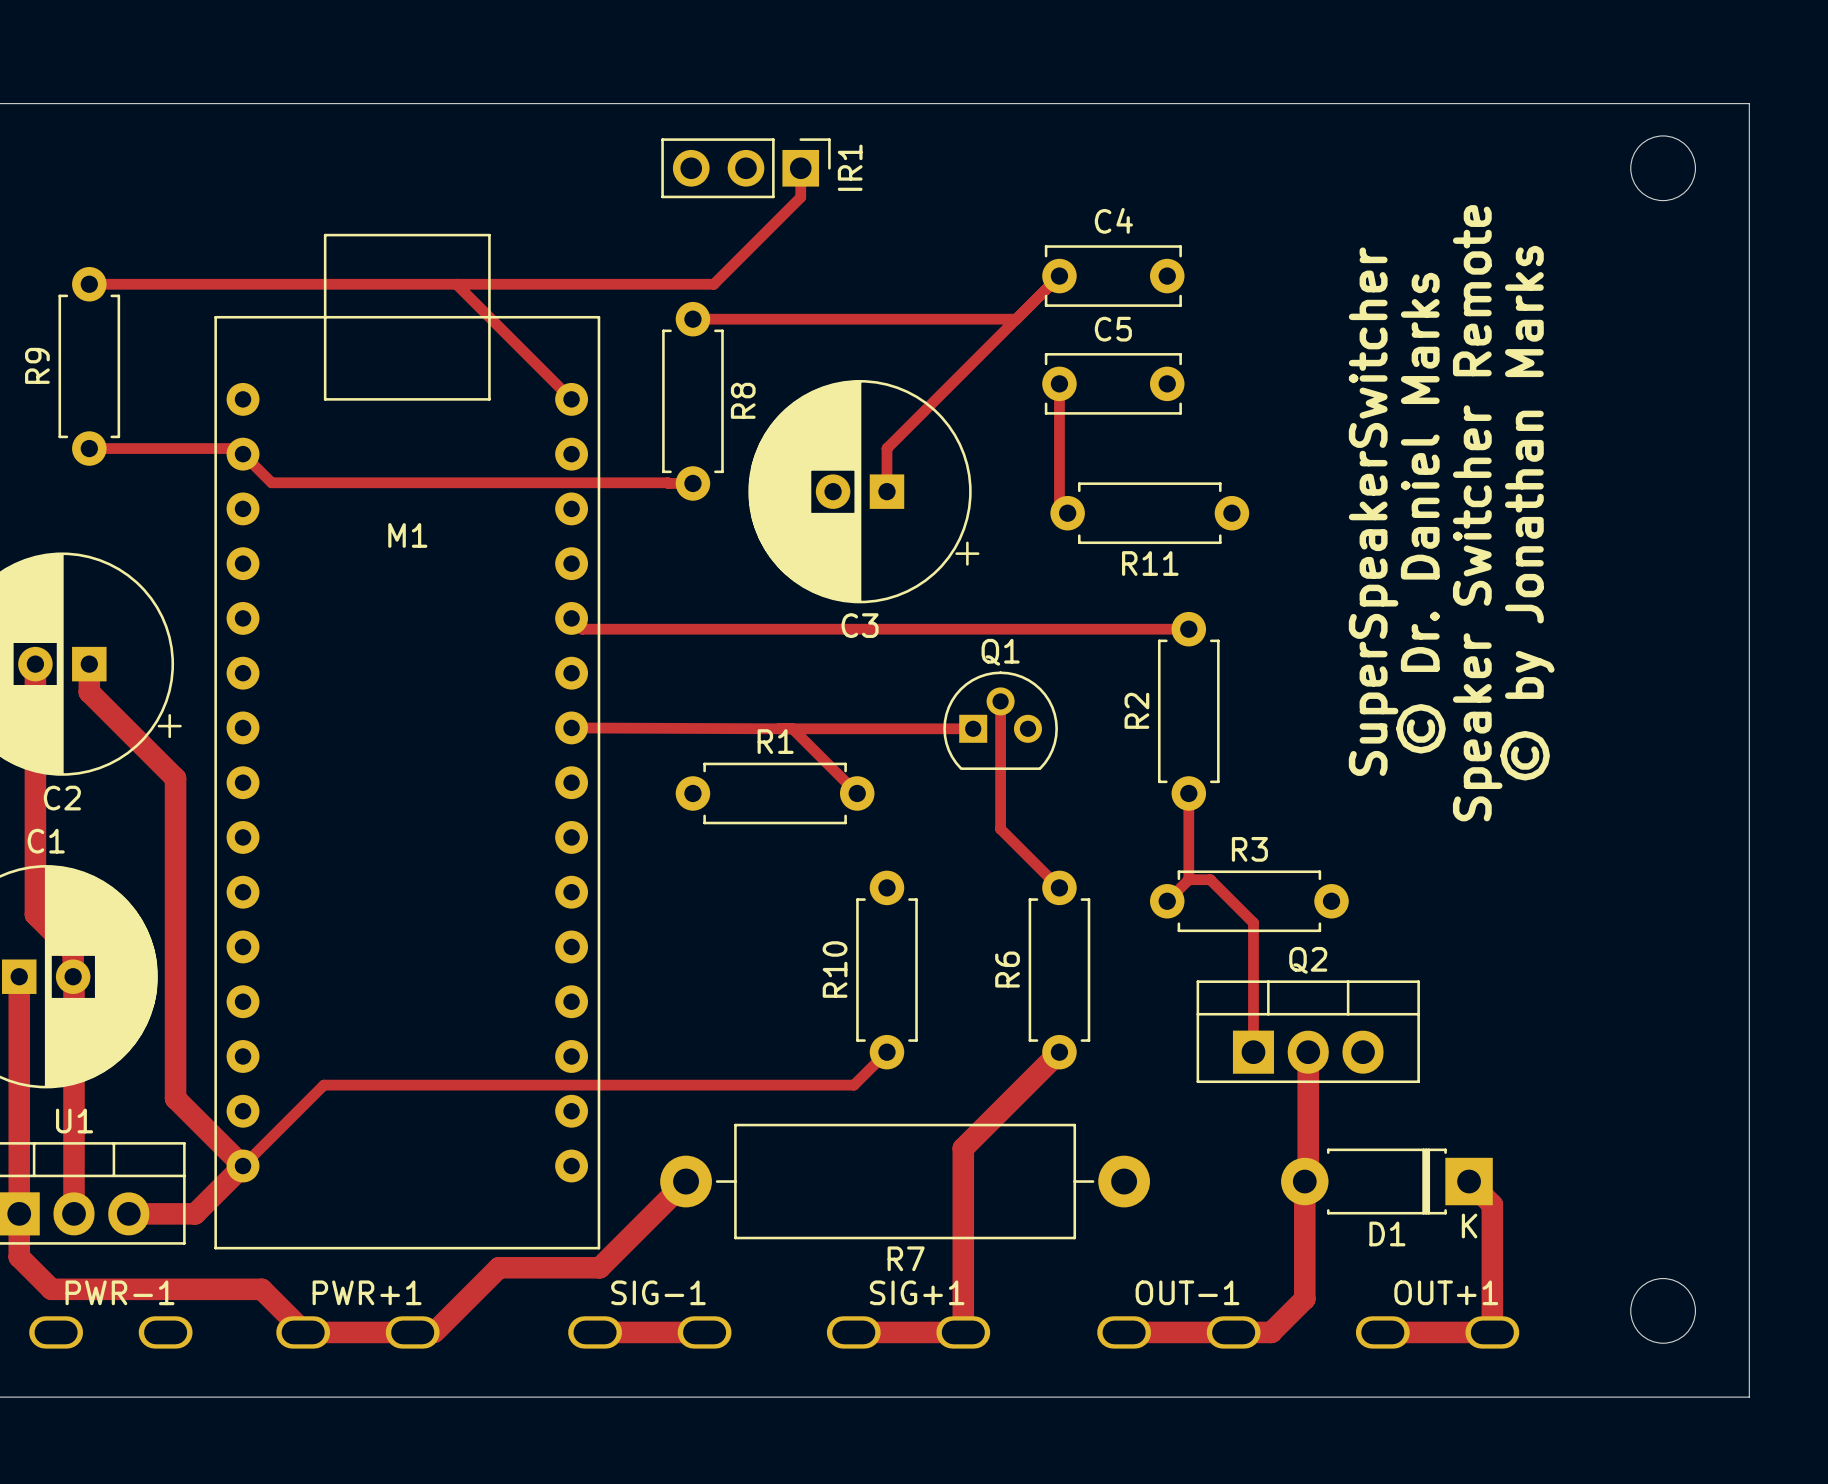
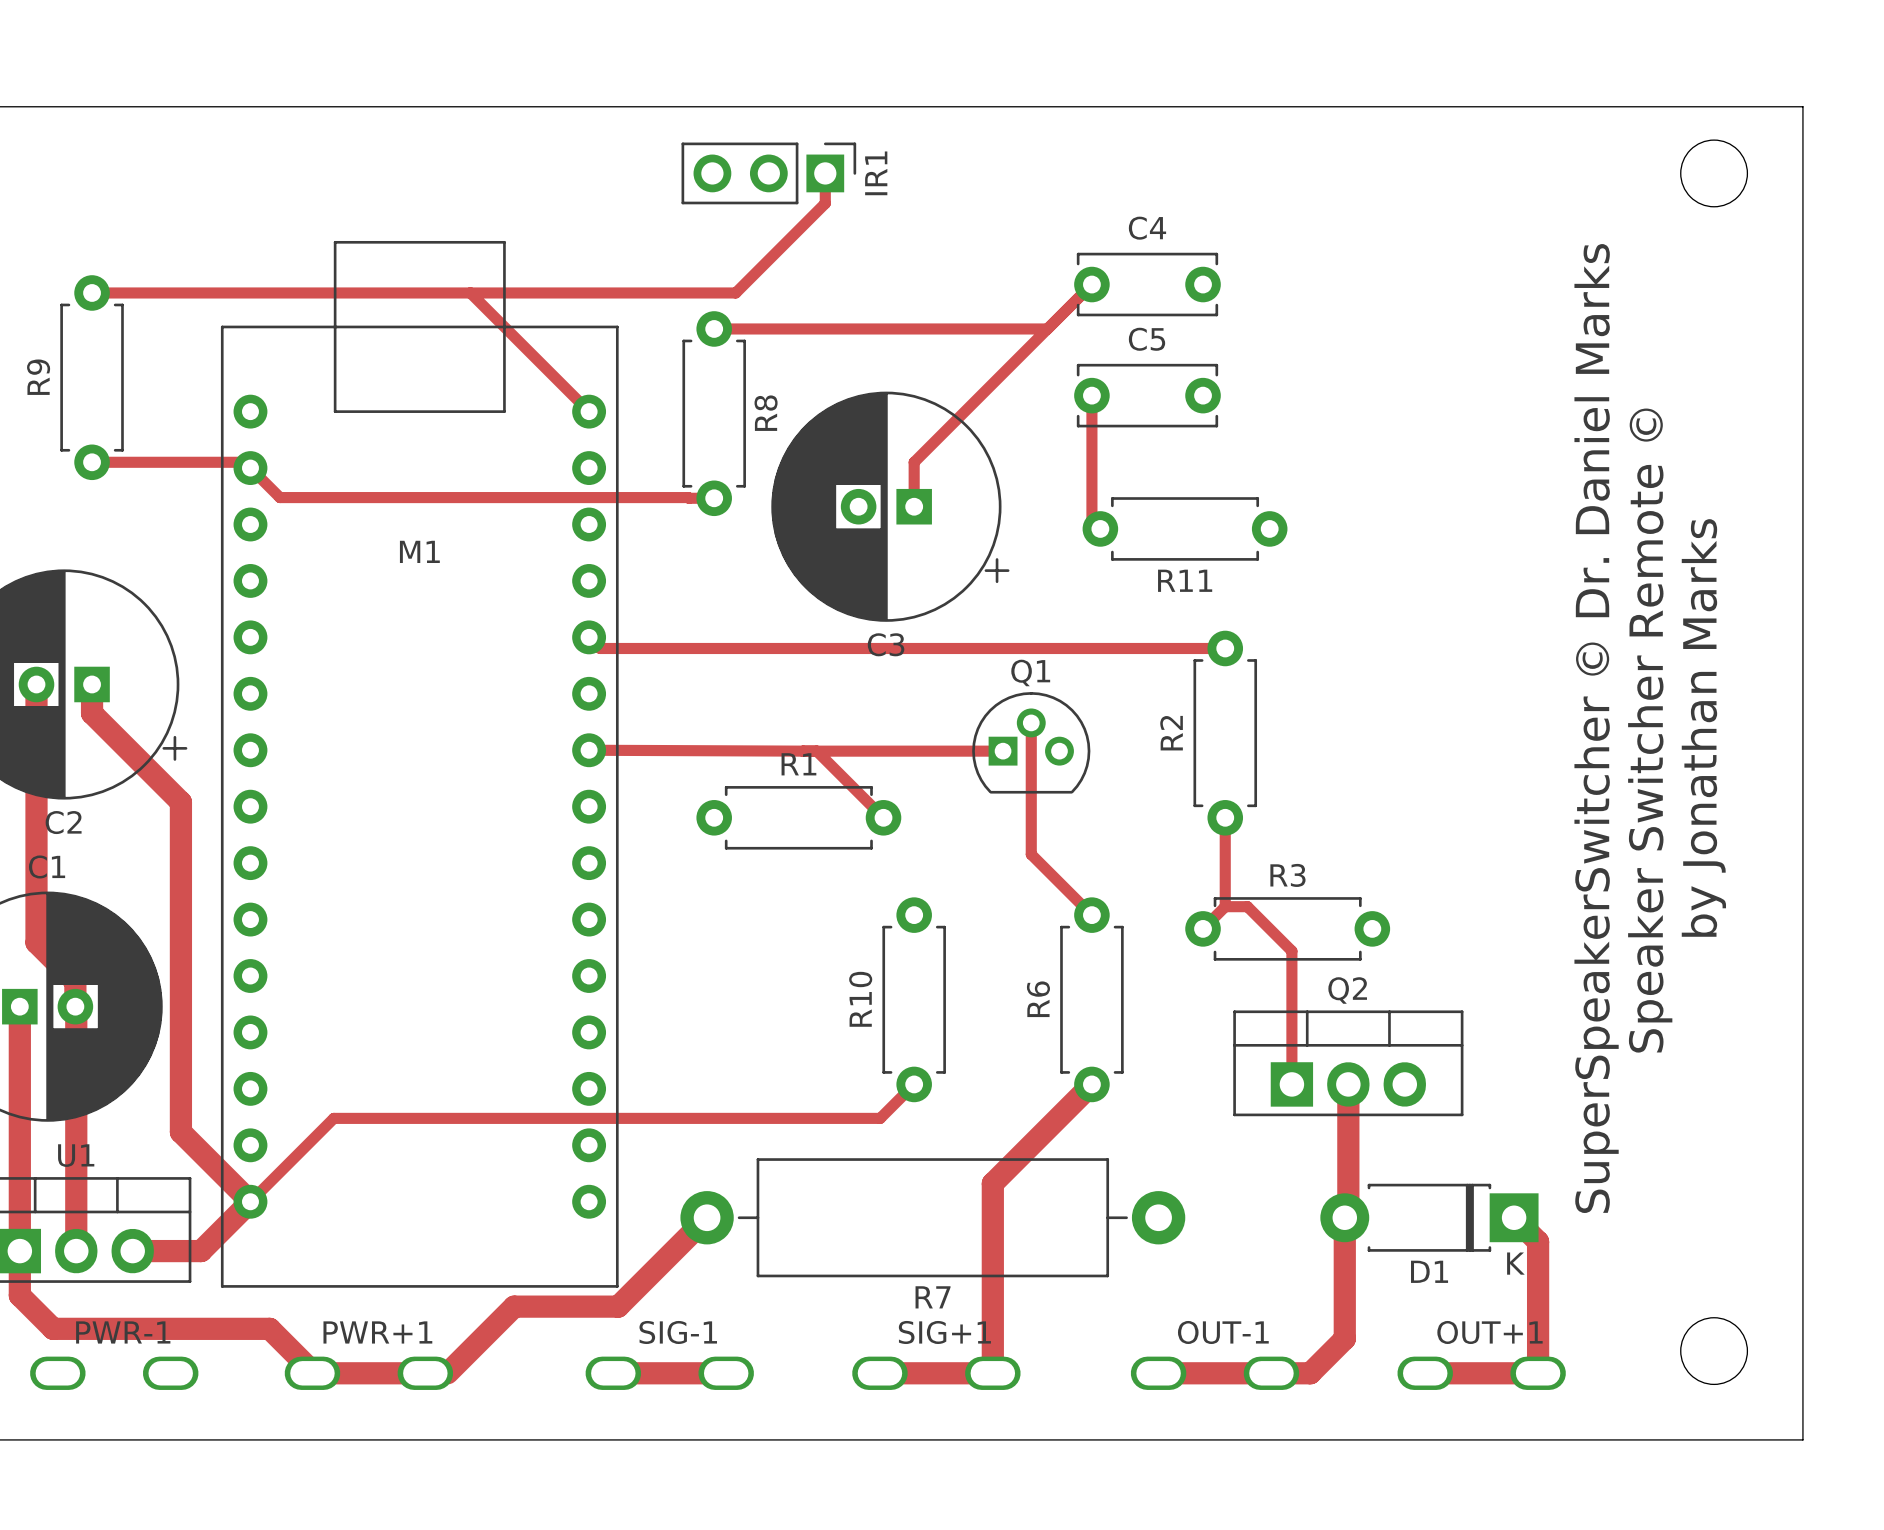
text: SuperSpeakerSwitcher (1373, 511) -> none
text: © Dr. Daniel Marks (1421, 513) -> none
text: Speaker Switcher Remote (1477, 513) -> none
text: © by Jonathan Marks (1527, 513) -> none
text: none -> by Jonathan Marks (1703, 727)
text: none -> SuperSpeakerSwitcher © Dr. Daniel Marks (1596, 728)
text: none -> Speaker Switcher Remote © (1650, 730)

